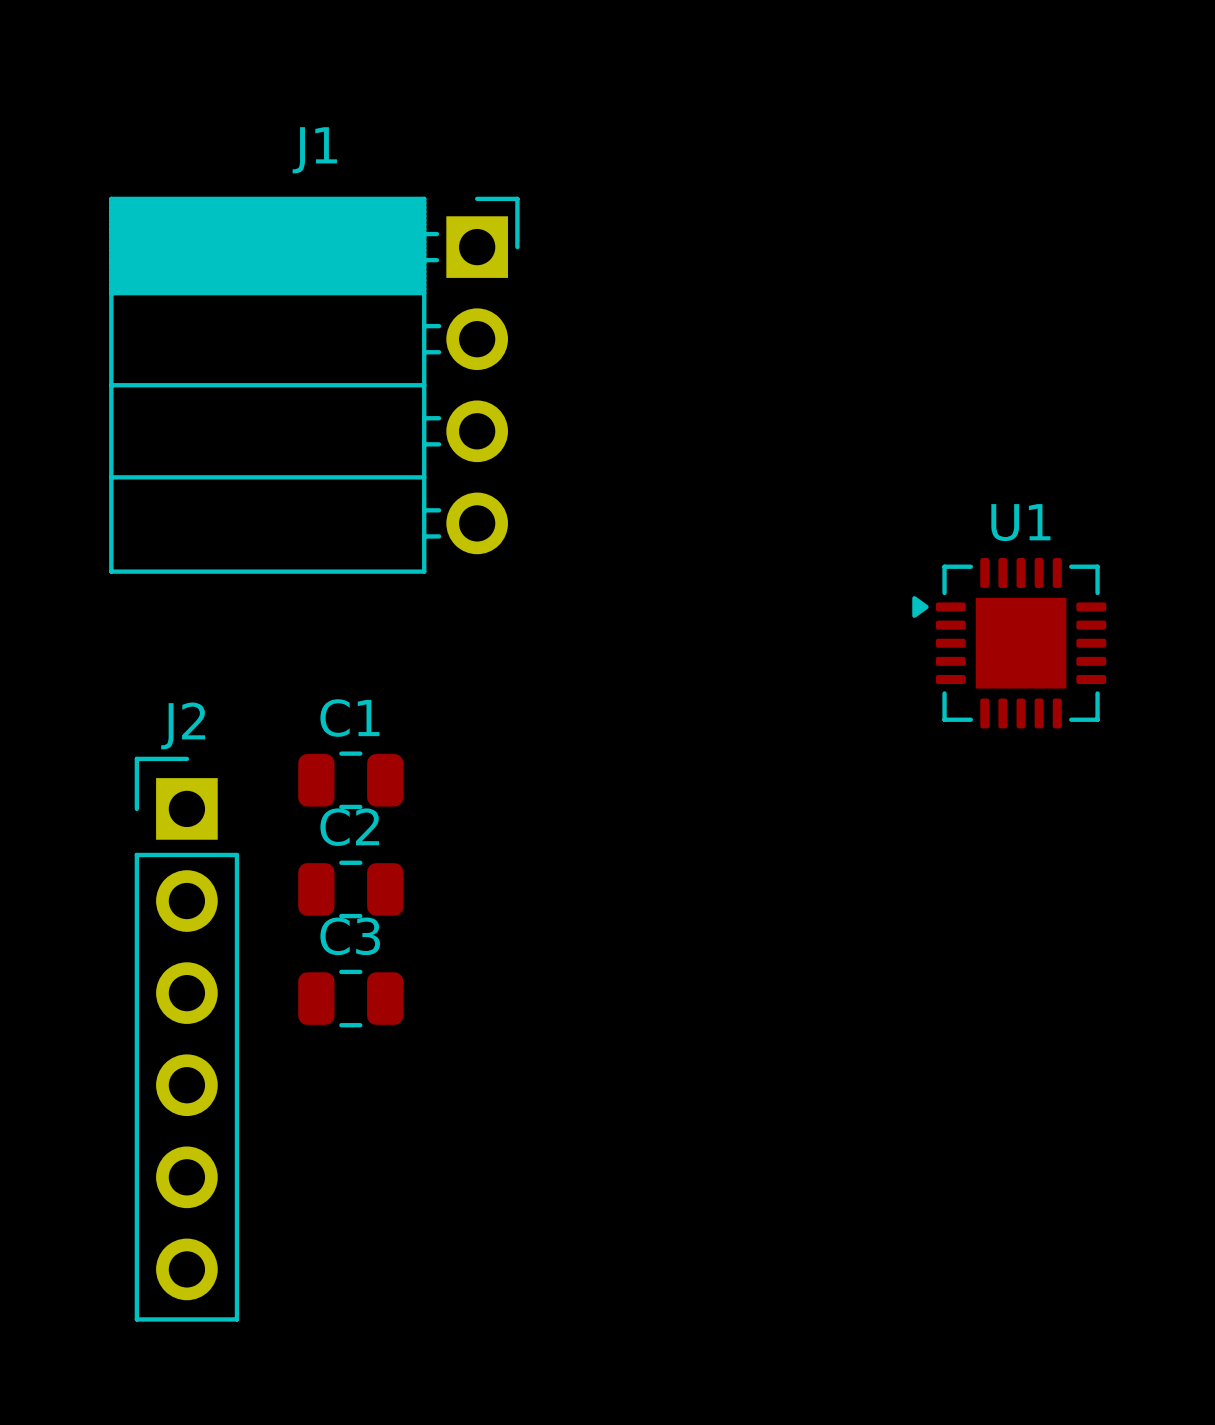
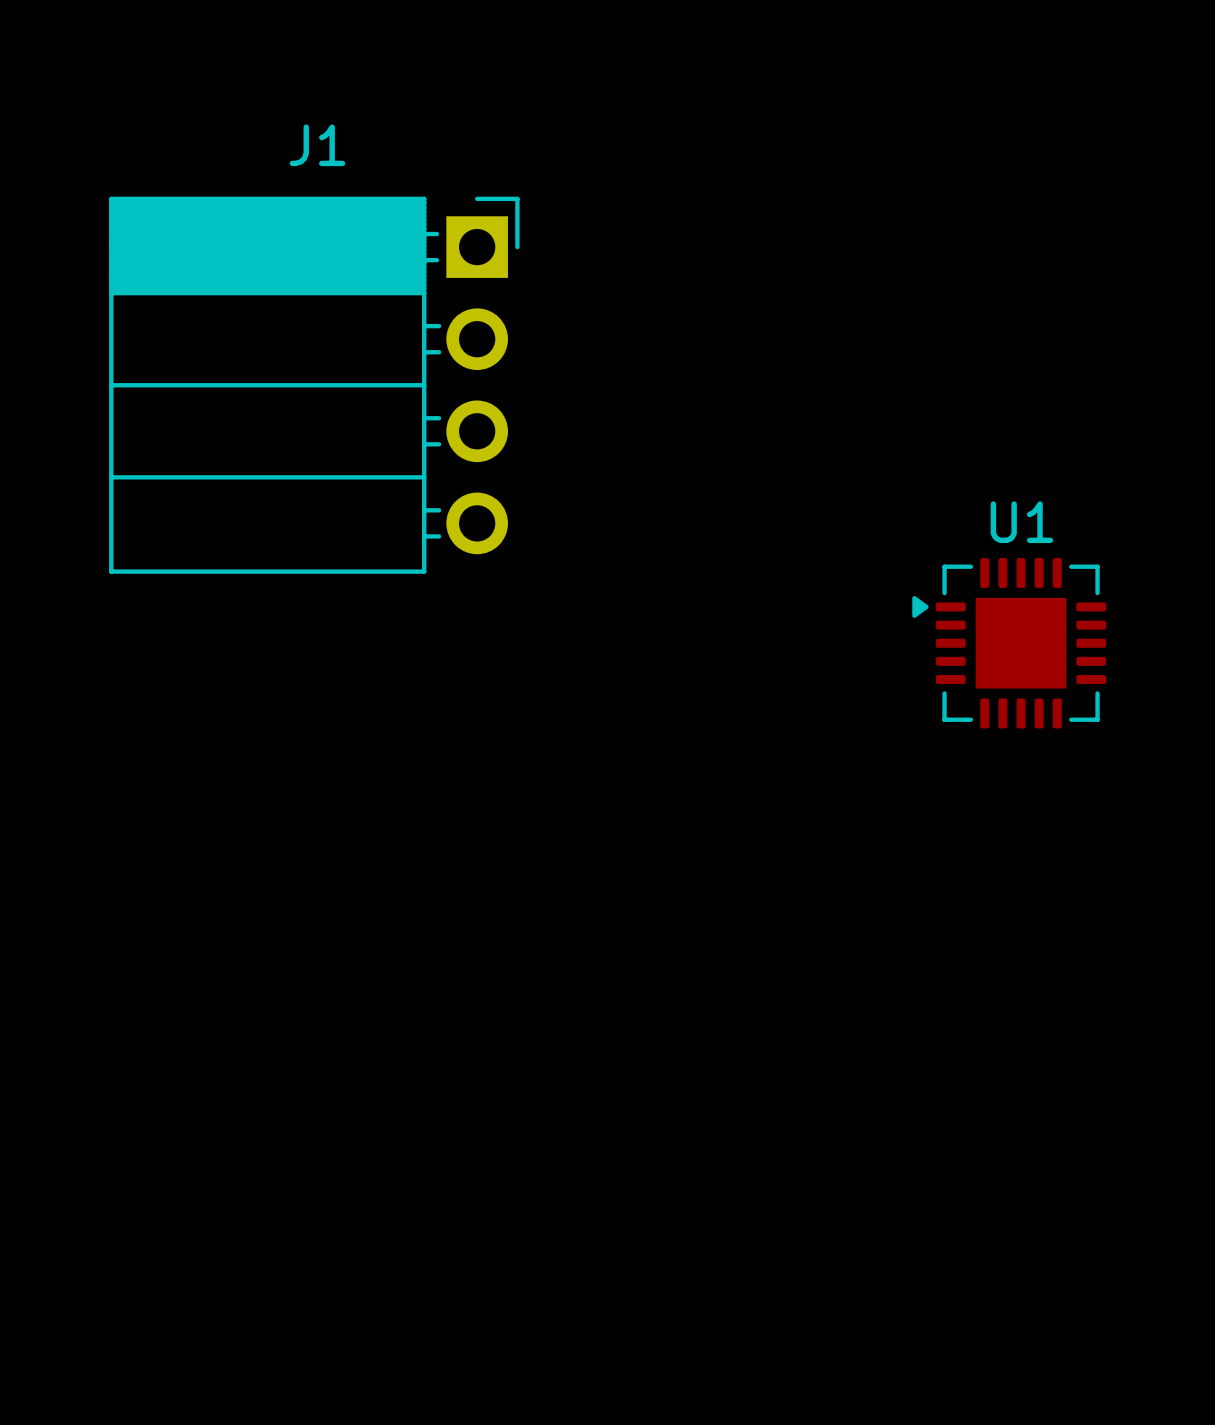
C1: (350, 780) -> none
C2: (350, 889) -> none
C3: (350, 998) -> none
J2: (186, 1039) -> none

